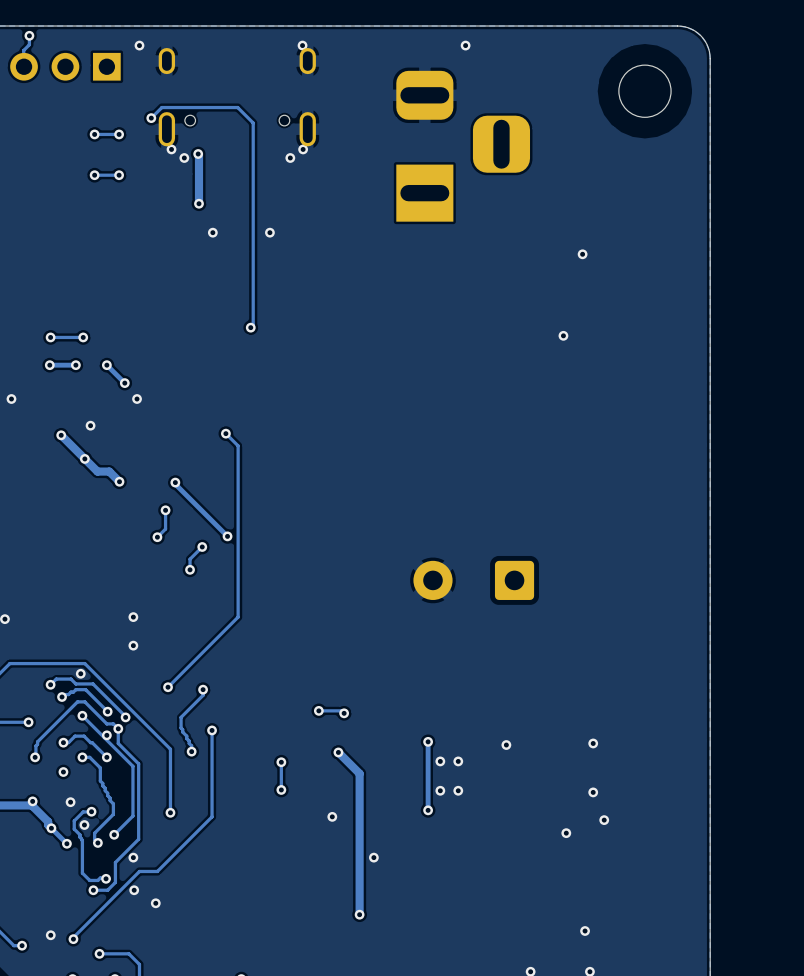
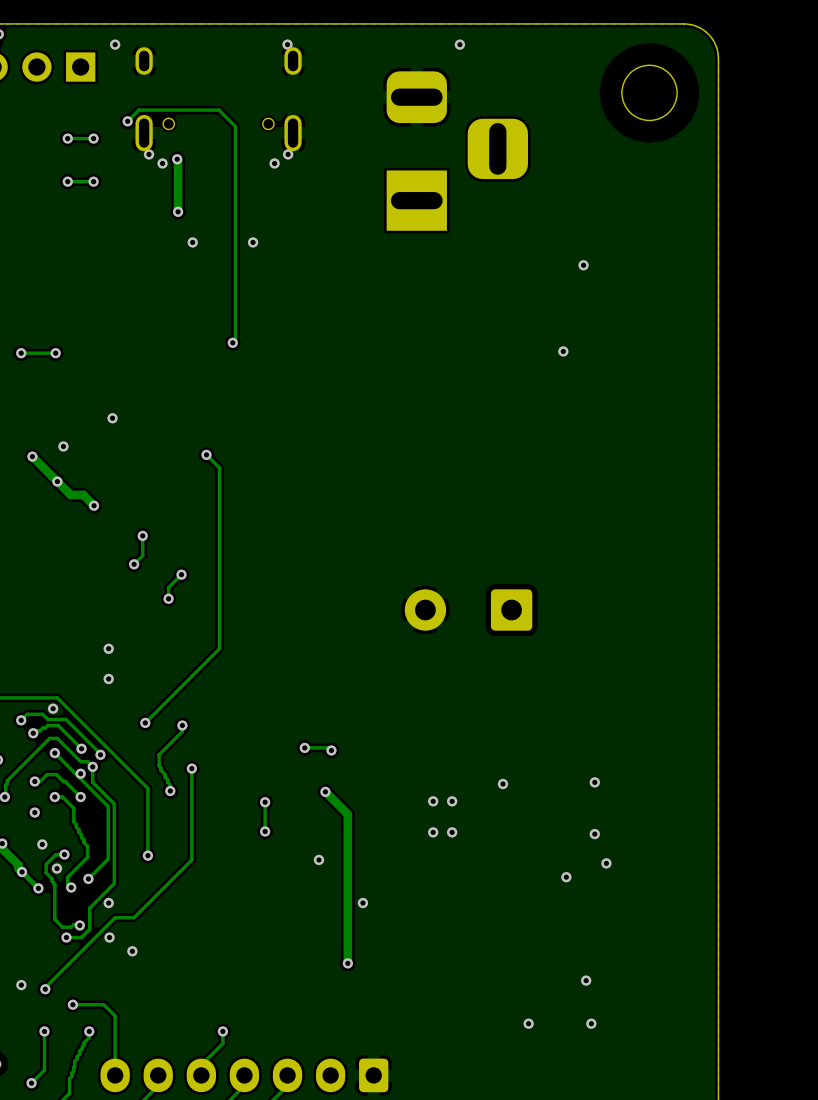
via: (49, 365) -> none
track: (75, 365) (49, 365) -> none
via: (75, 365) -> none
track: (106, 365) (124, 383) -> none
via: (106, 365) -> none
via: (124, 383) -> none
track: (175, 482) (227, 536) -> none
via: (175, 482) -> none
via: (227, 536) -> none
track: (428, 741) (428, 810) -> none
via: (428, 741) -> none
via: (428, 810) -> none

